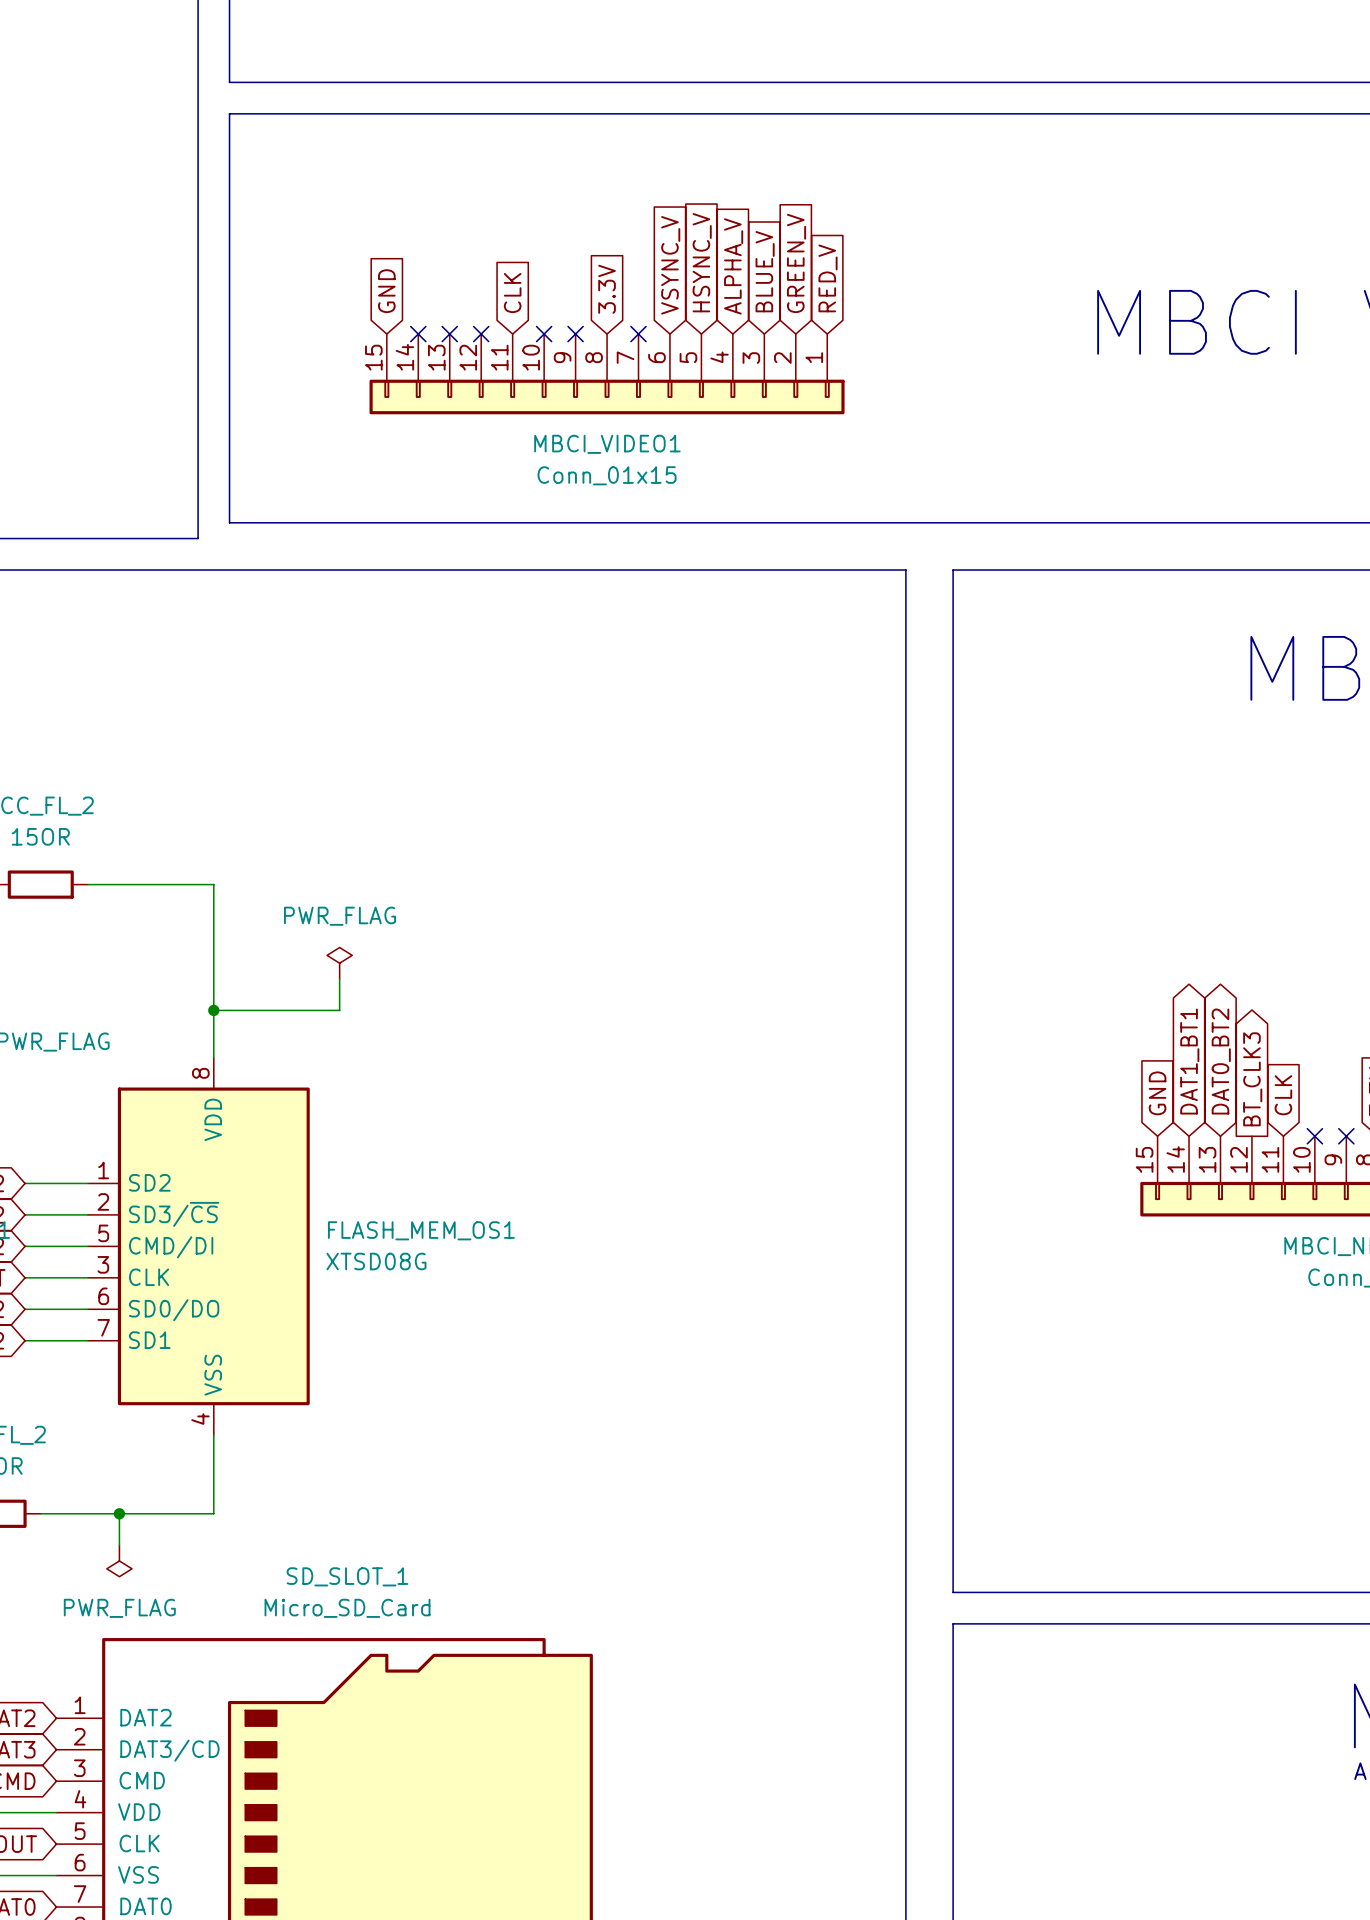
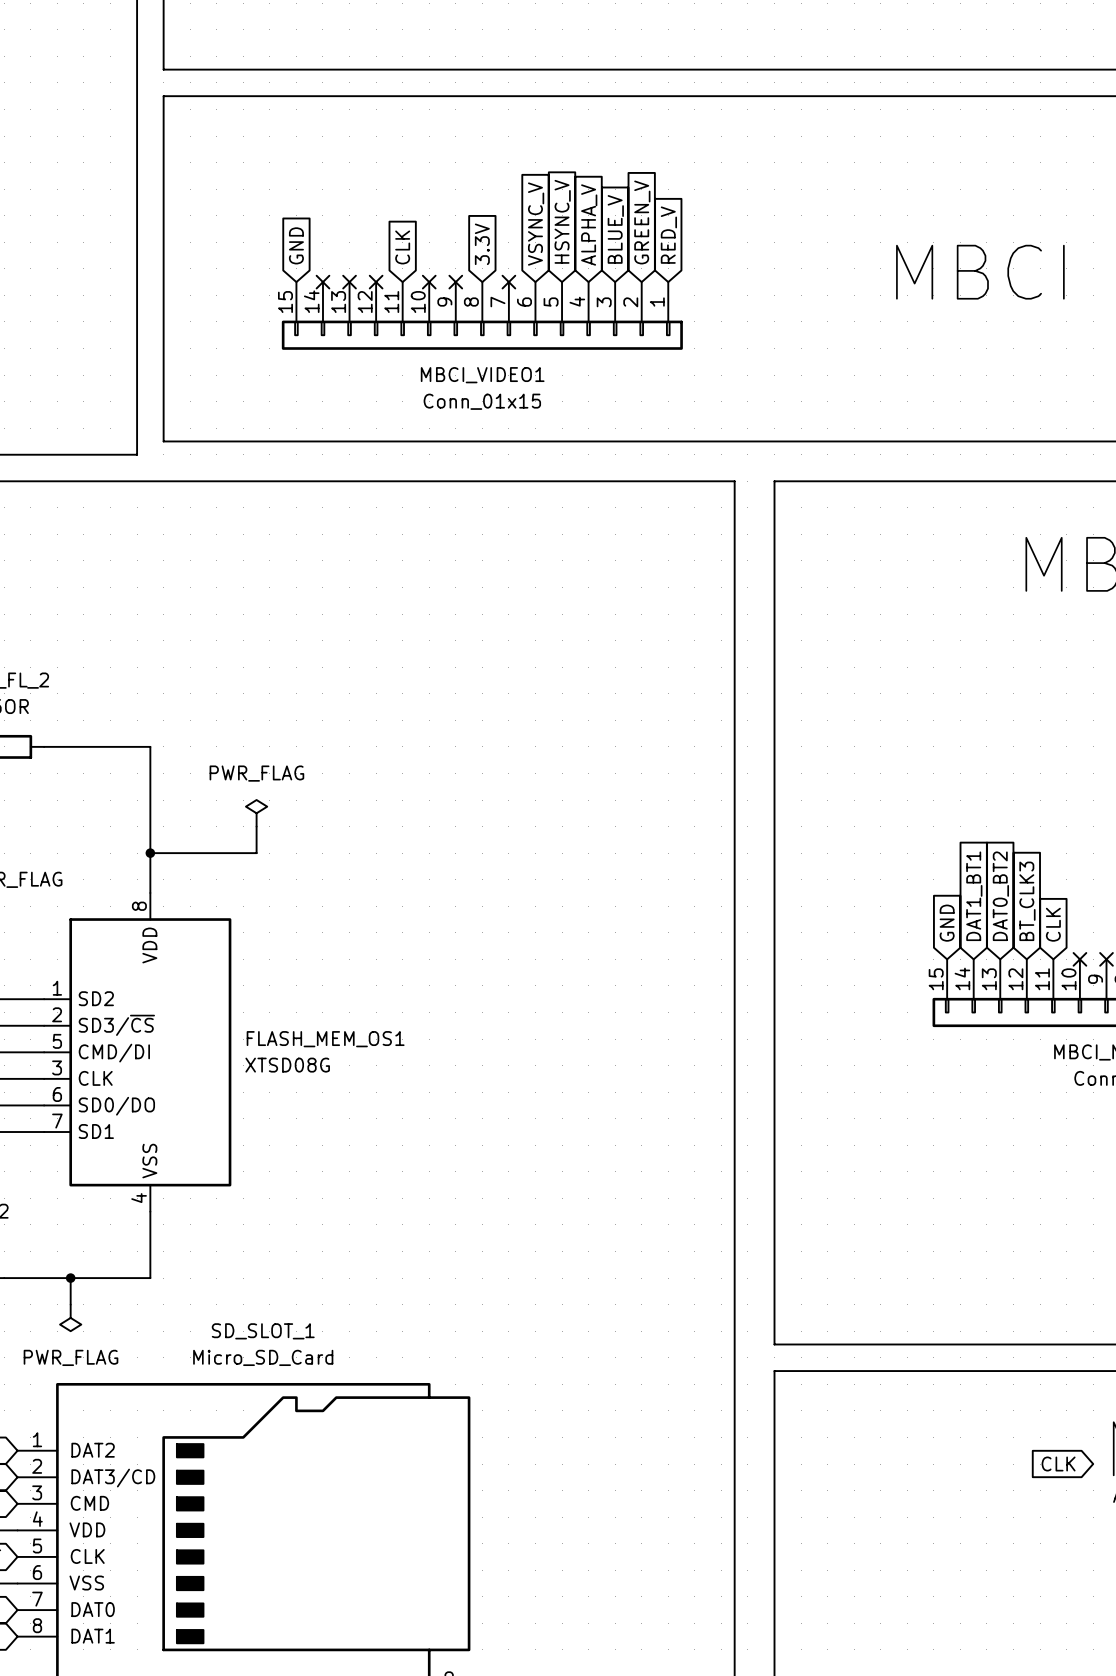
global label shape: bidirectional (1189, 1061) -> input (974, 896)
global label shape: bidirectional (1221, 1061) -> input (1000, 896)
global label shape: output (1252, 1079) -> input (1027, 901)
global label: none -> CLK (1058, 1464)

